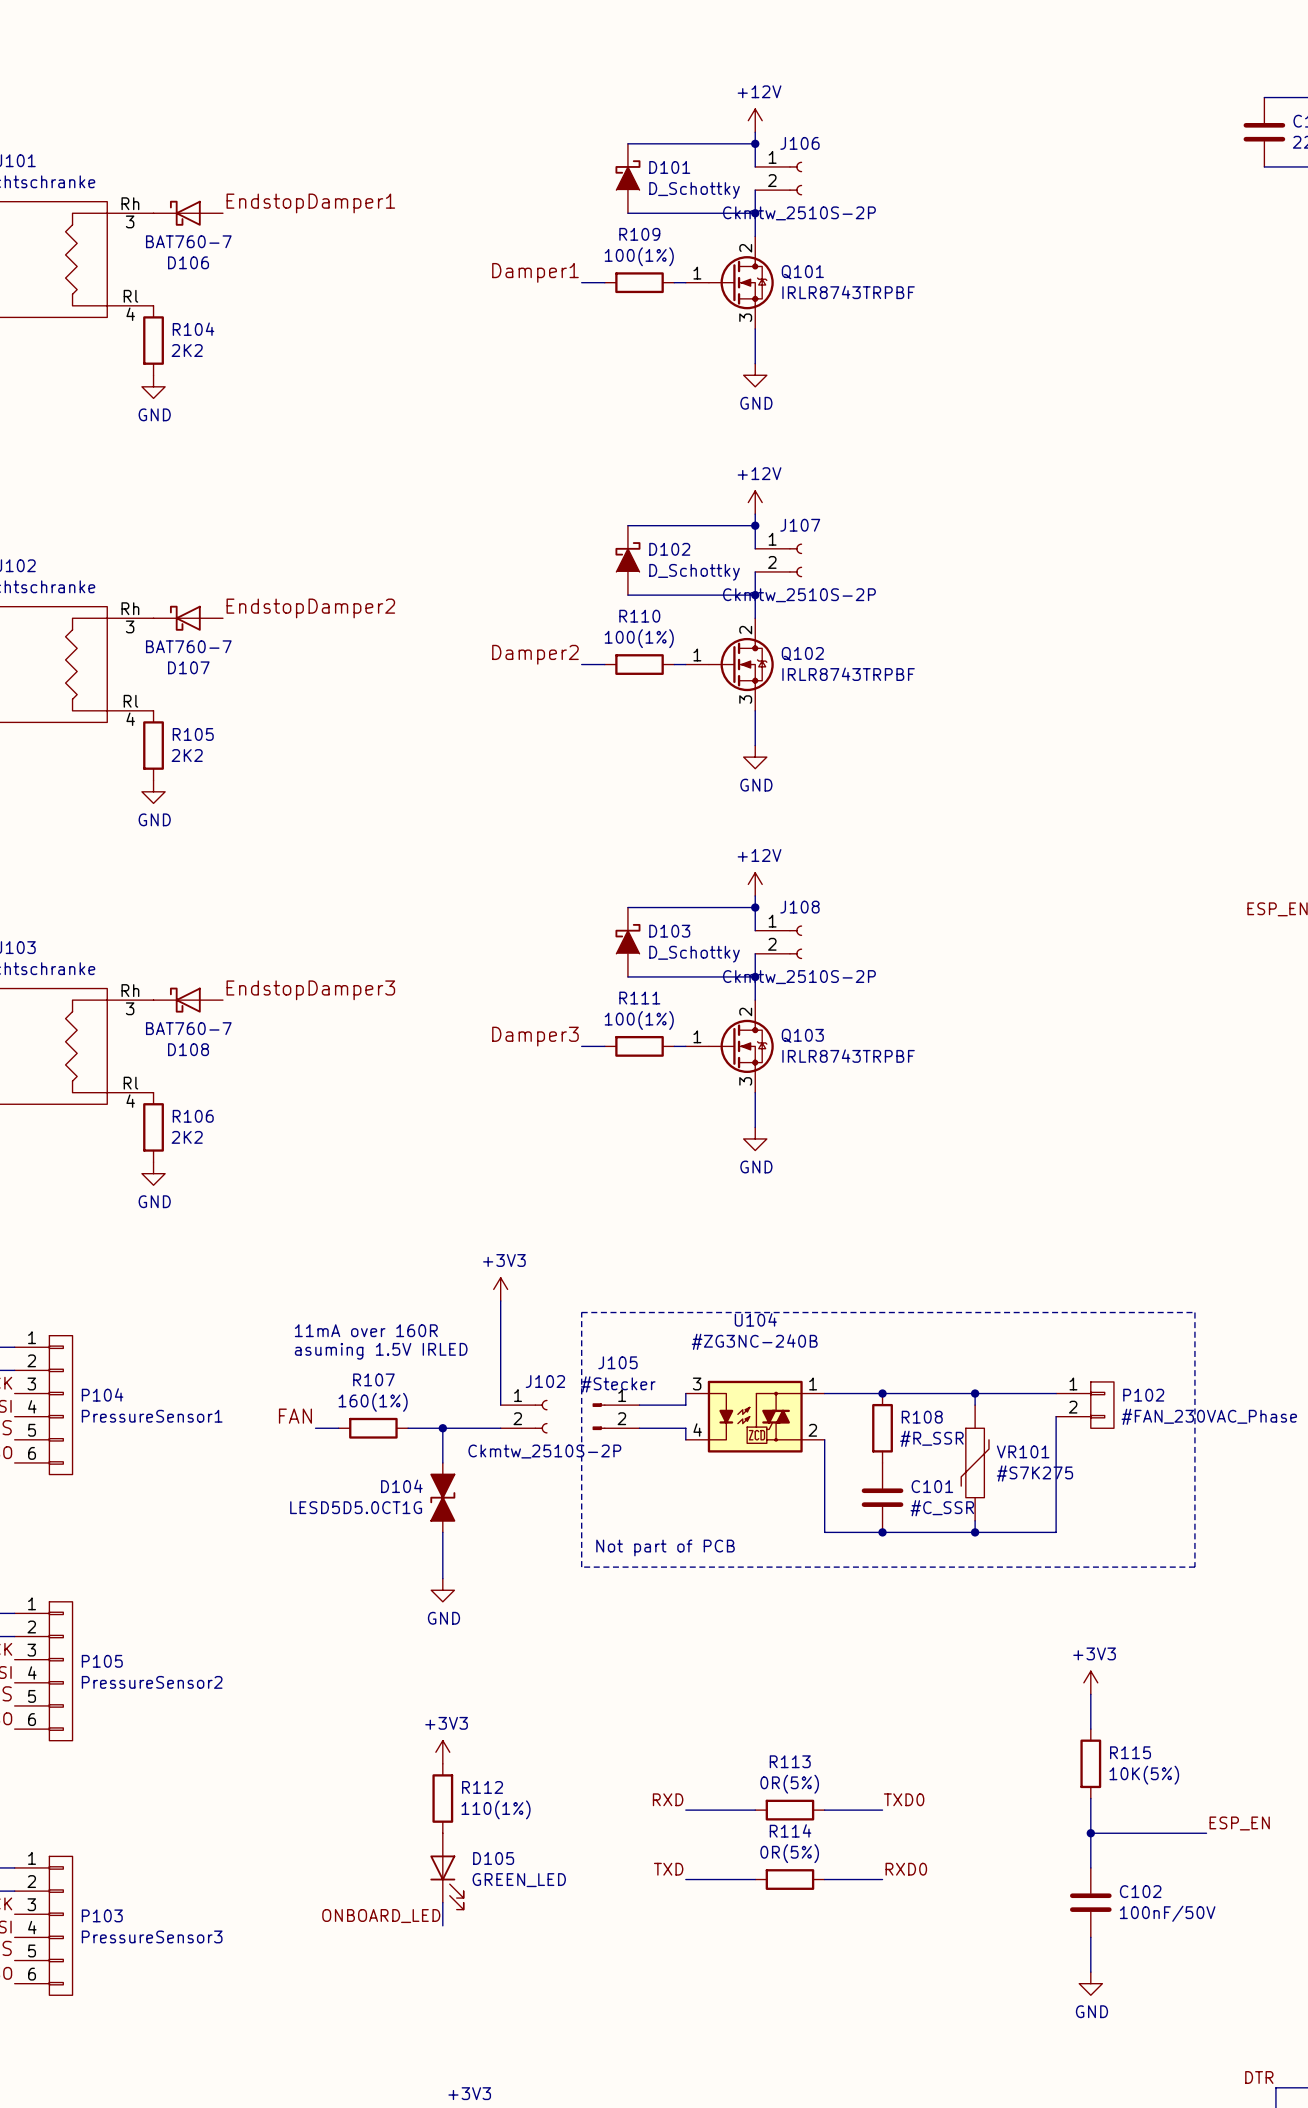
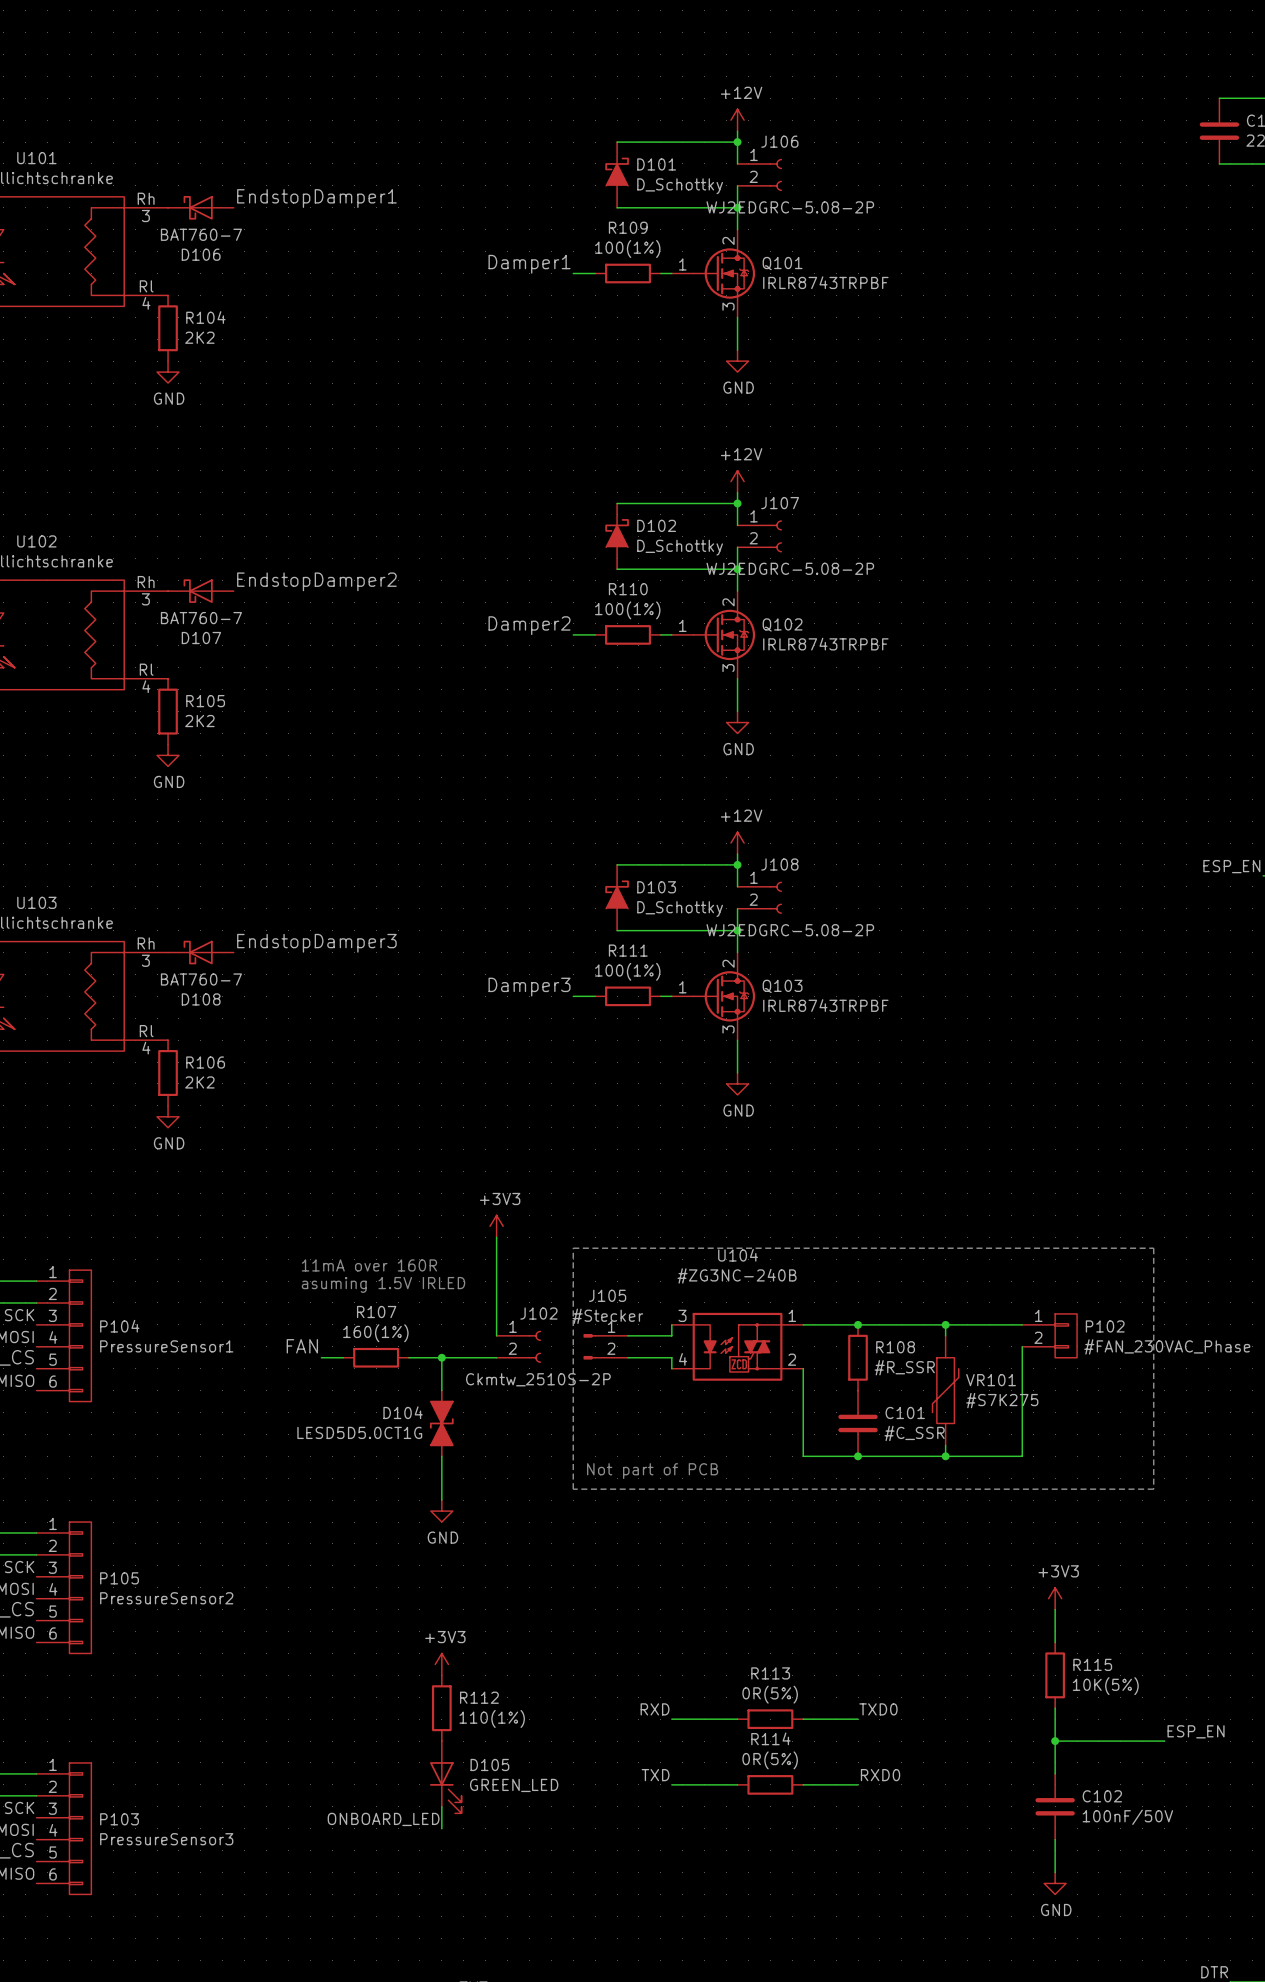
J106 value: Ckmtw_2510S-2P (799, 213) -> WJ2EDGRC-5.08-2P (790, 207)
J107 value: Ckmtw_2510S-2P (799, 595) -> WJ2EDGRC-5.08-2P (790, 568)
J108 value: Ckmtw_2510S-2P (799, 977) -> WJ2EDGRC-5.08-2P (790, 930)

